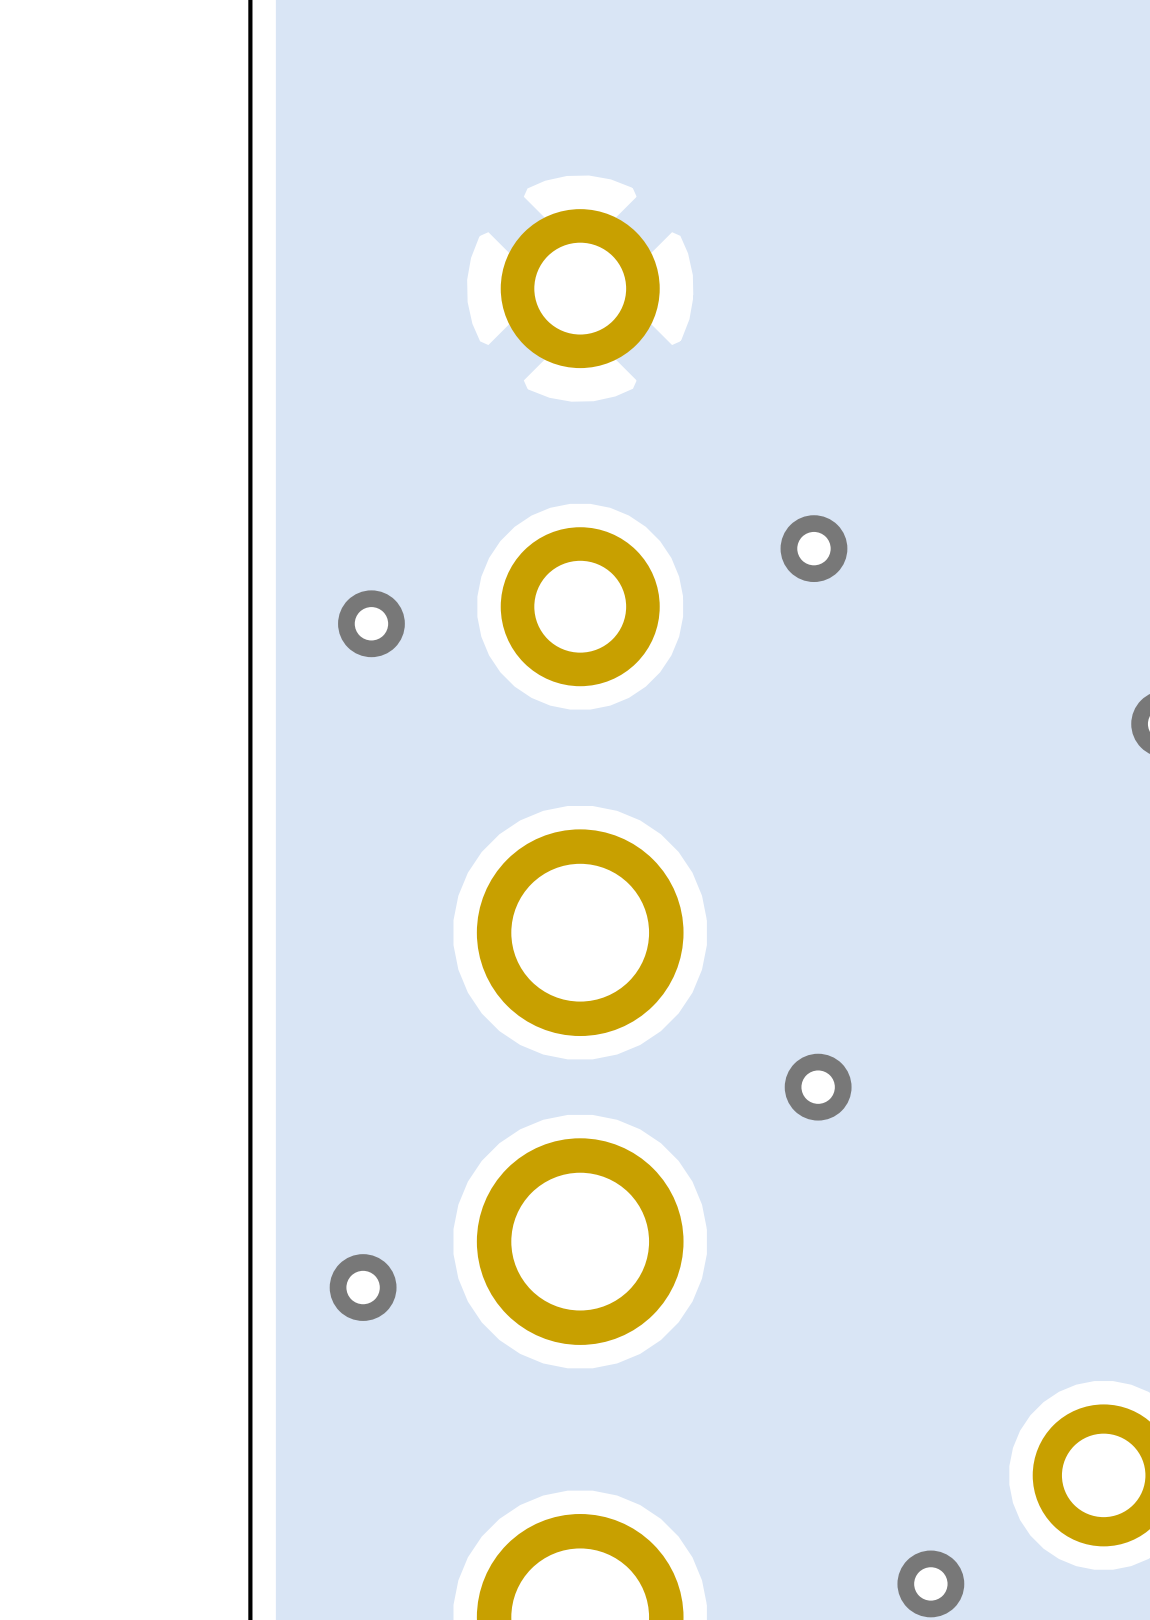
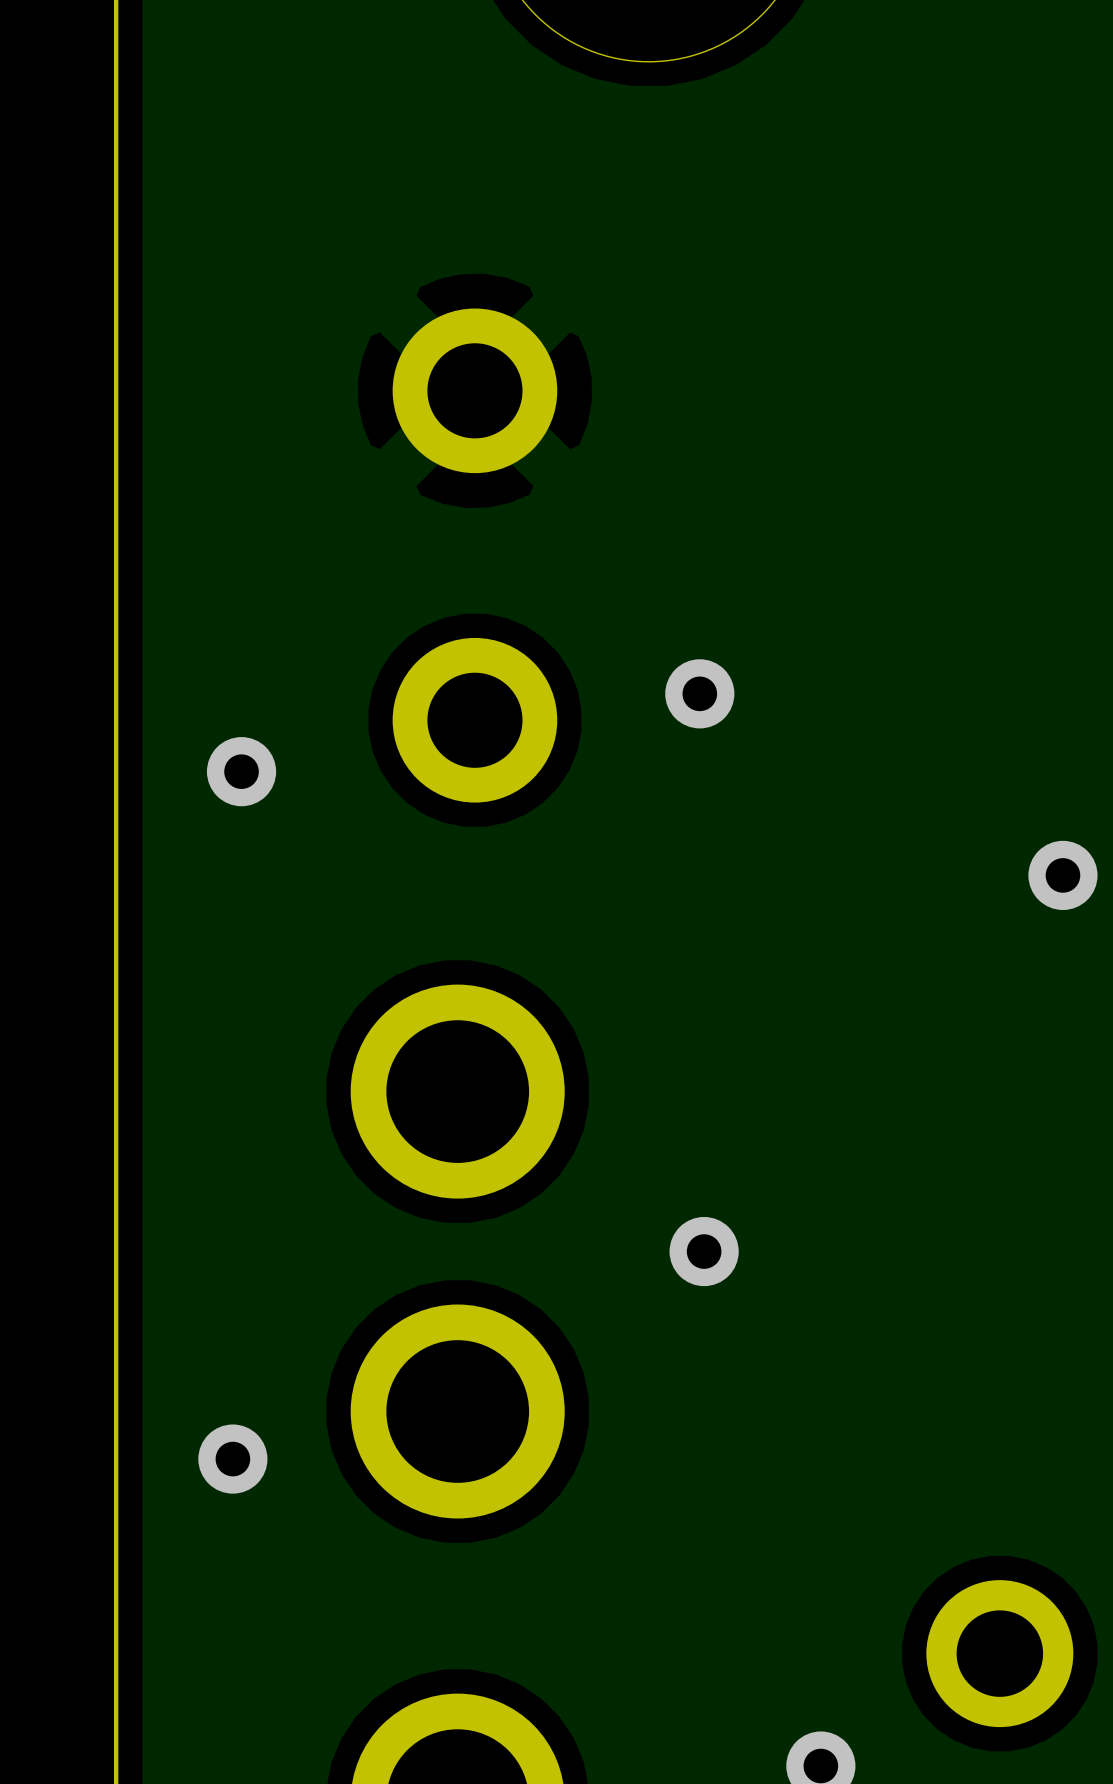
part position: (580, 447) -> (474, 555)

